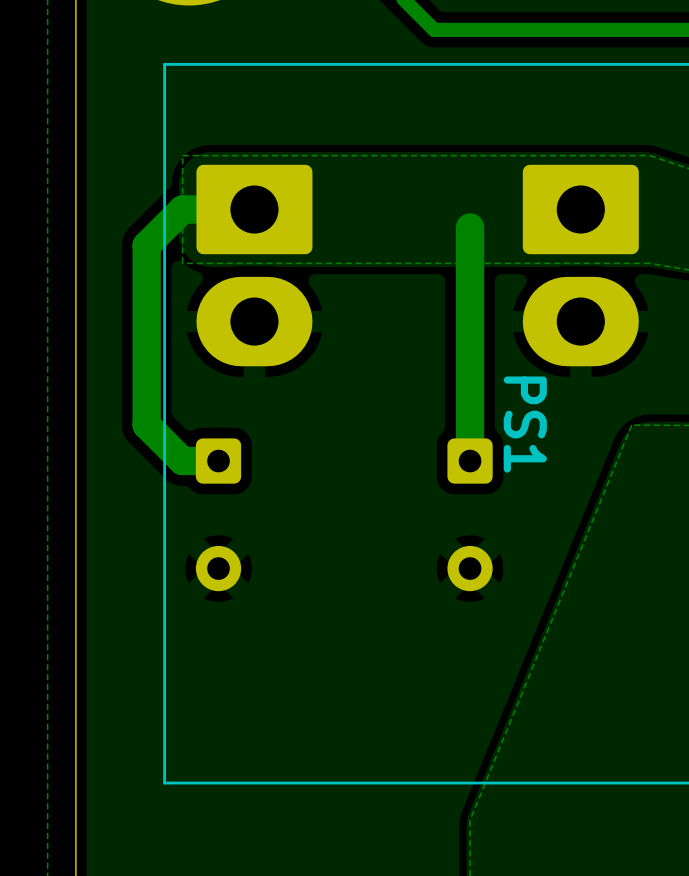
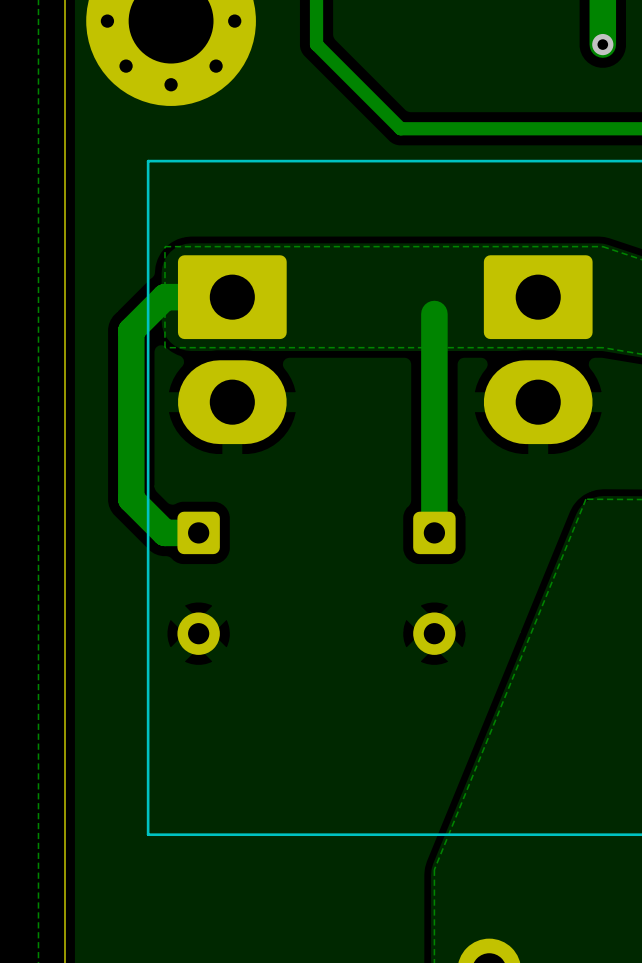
PS1 name: PS1 (525, 424) -> none

